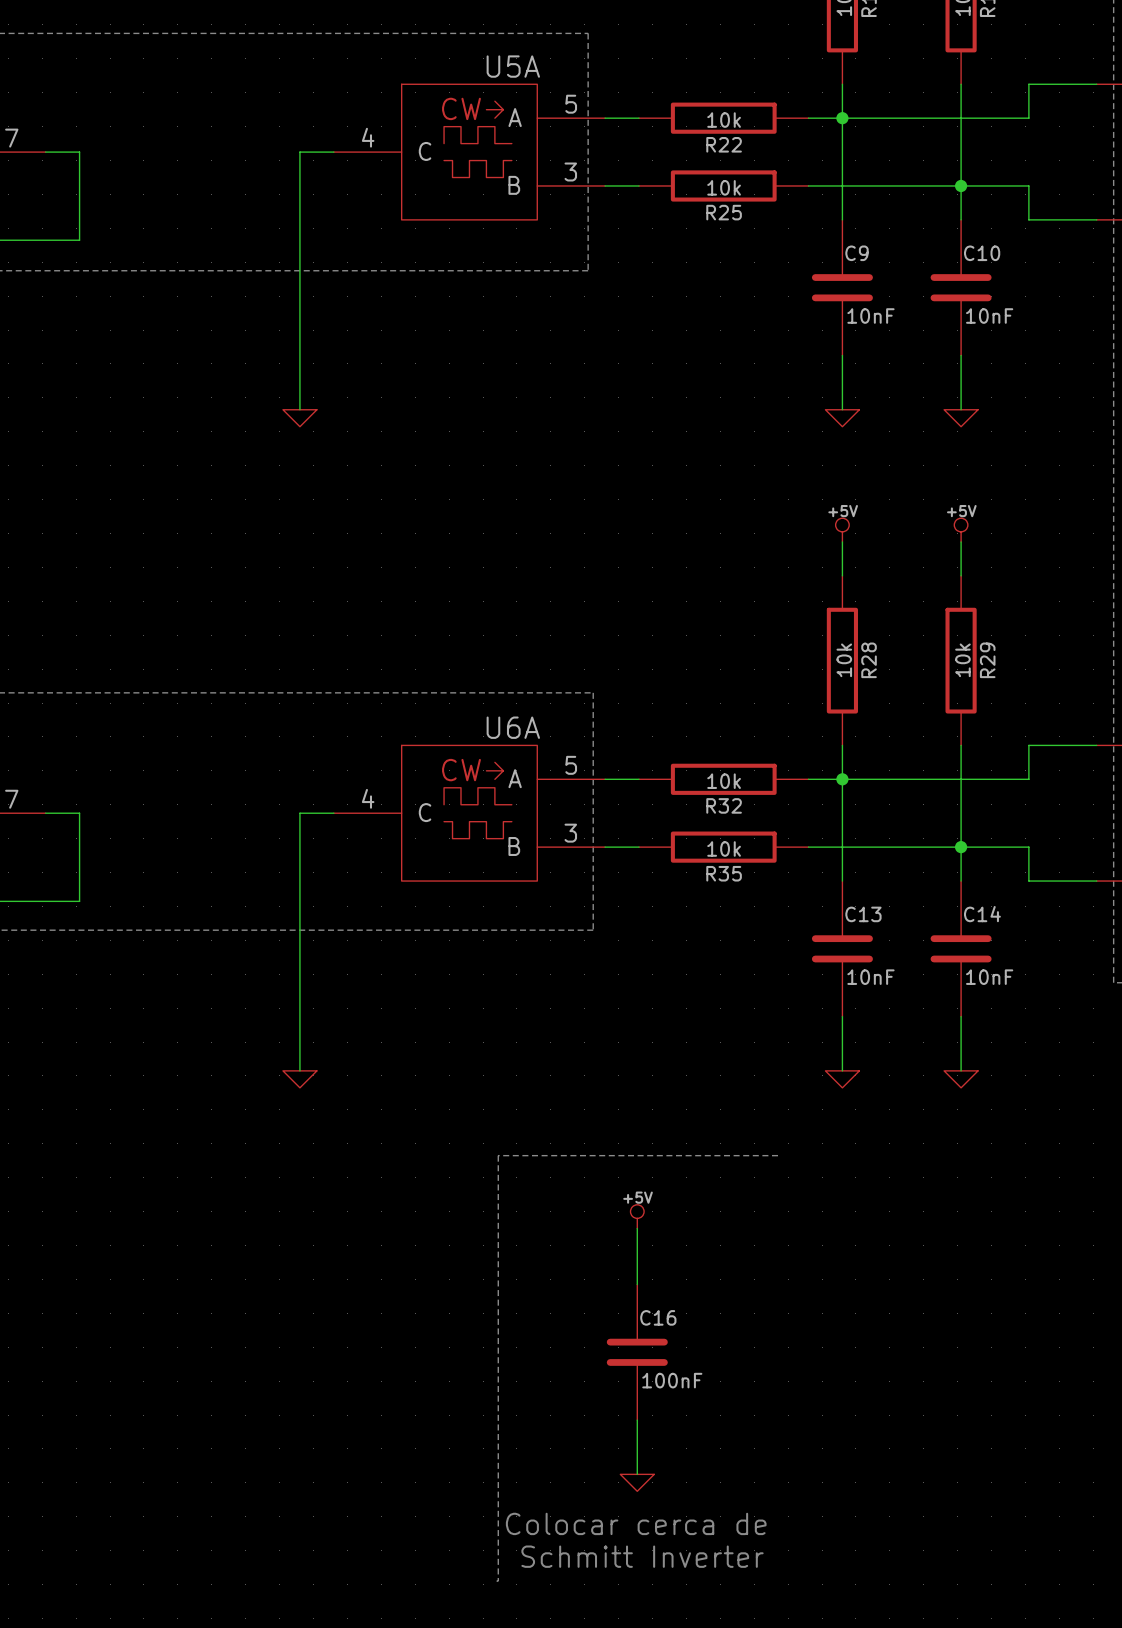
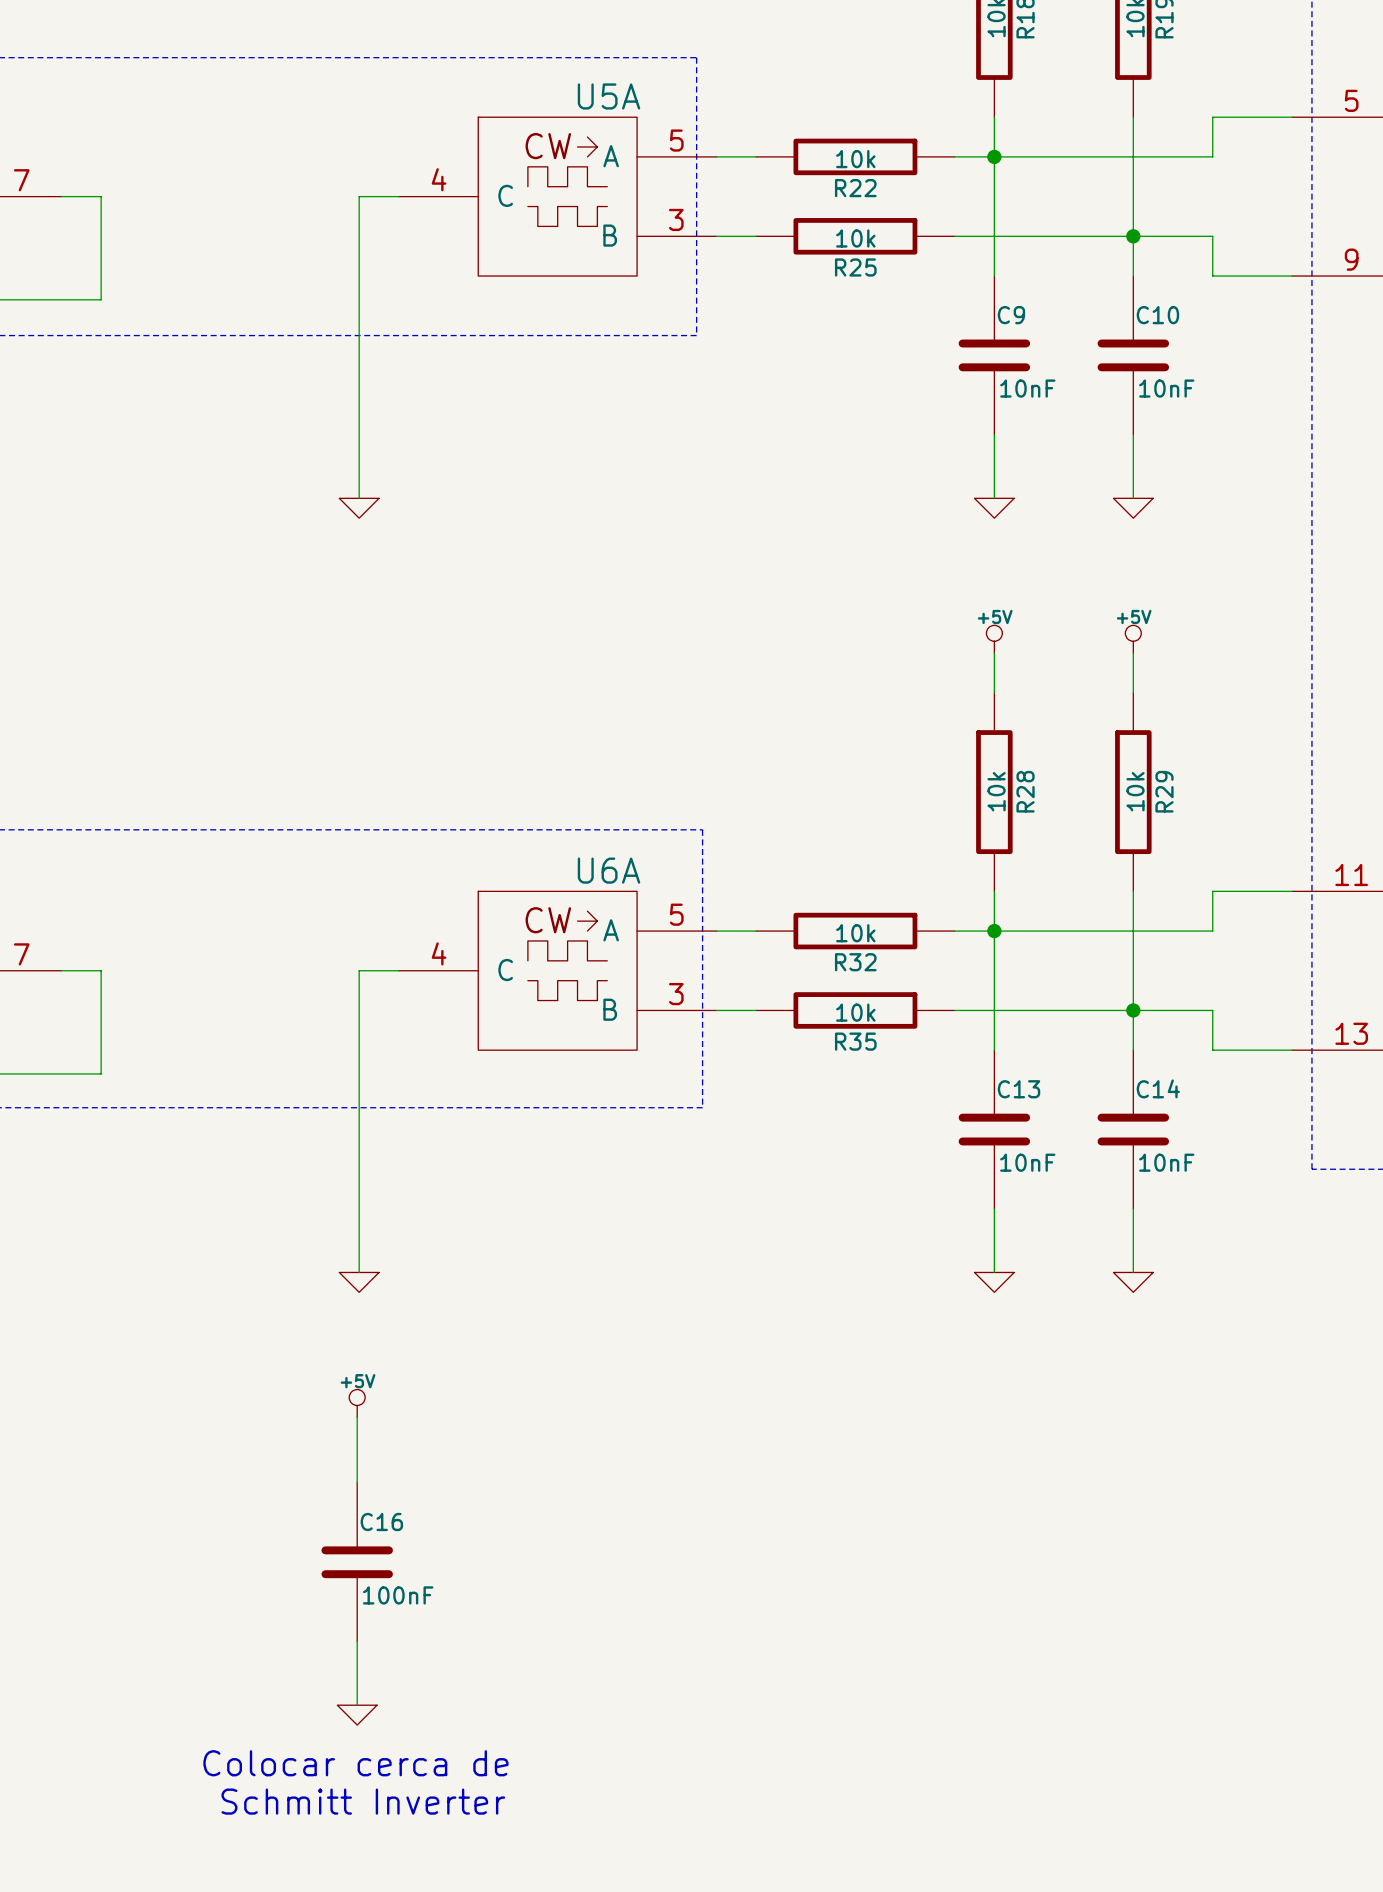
line: (778, 1155) (498, 1155) (498, 1581) (496, 1581) -> none
power symbol: none -> +5V (357, 1403)
wire: none -> (357, 1417) (357, 1482)
power symbol: +5V (637, 1216) -> none
wire: (637, 1228) (637, 1284) -> none
C16 position: (637, 1352) -> (357, 1562)
wire: none -> (357, 1641) (357, 1705)
wire: (637, 1420) (637, 1474) -> none
power symbol: none -> (357, 1715)
power symbol: (637, 1482) -> none
text: none -> Colocar cerca de (355, 1763)
text: none -> Schmitt Inverter (363, 1801)
text: Colocar cerca de (636, 1523) -> none
text: Schmitt Inverter (642, 1556) -> none

